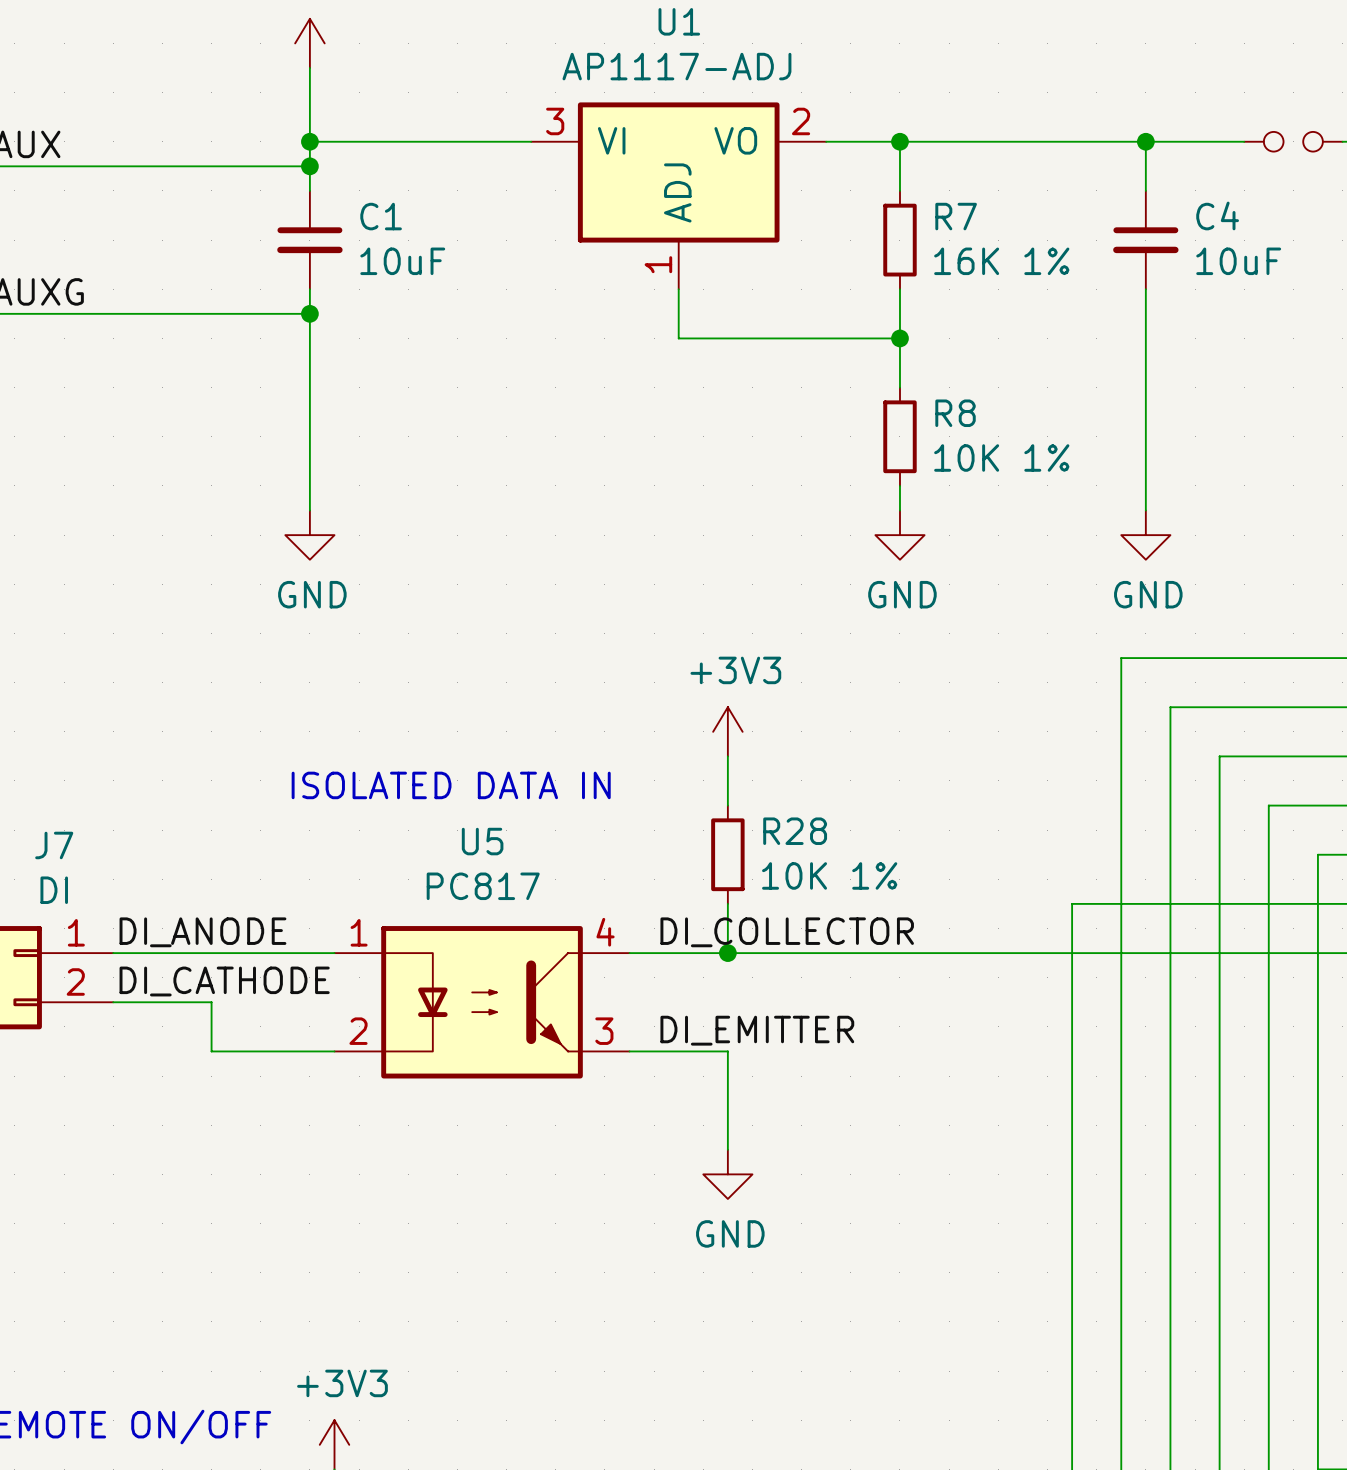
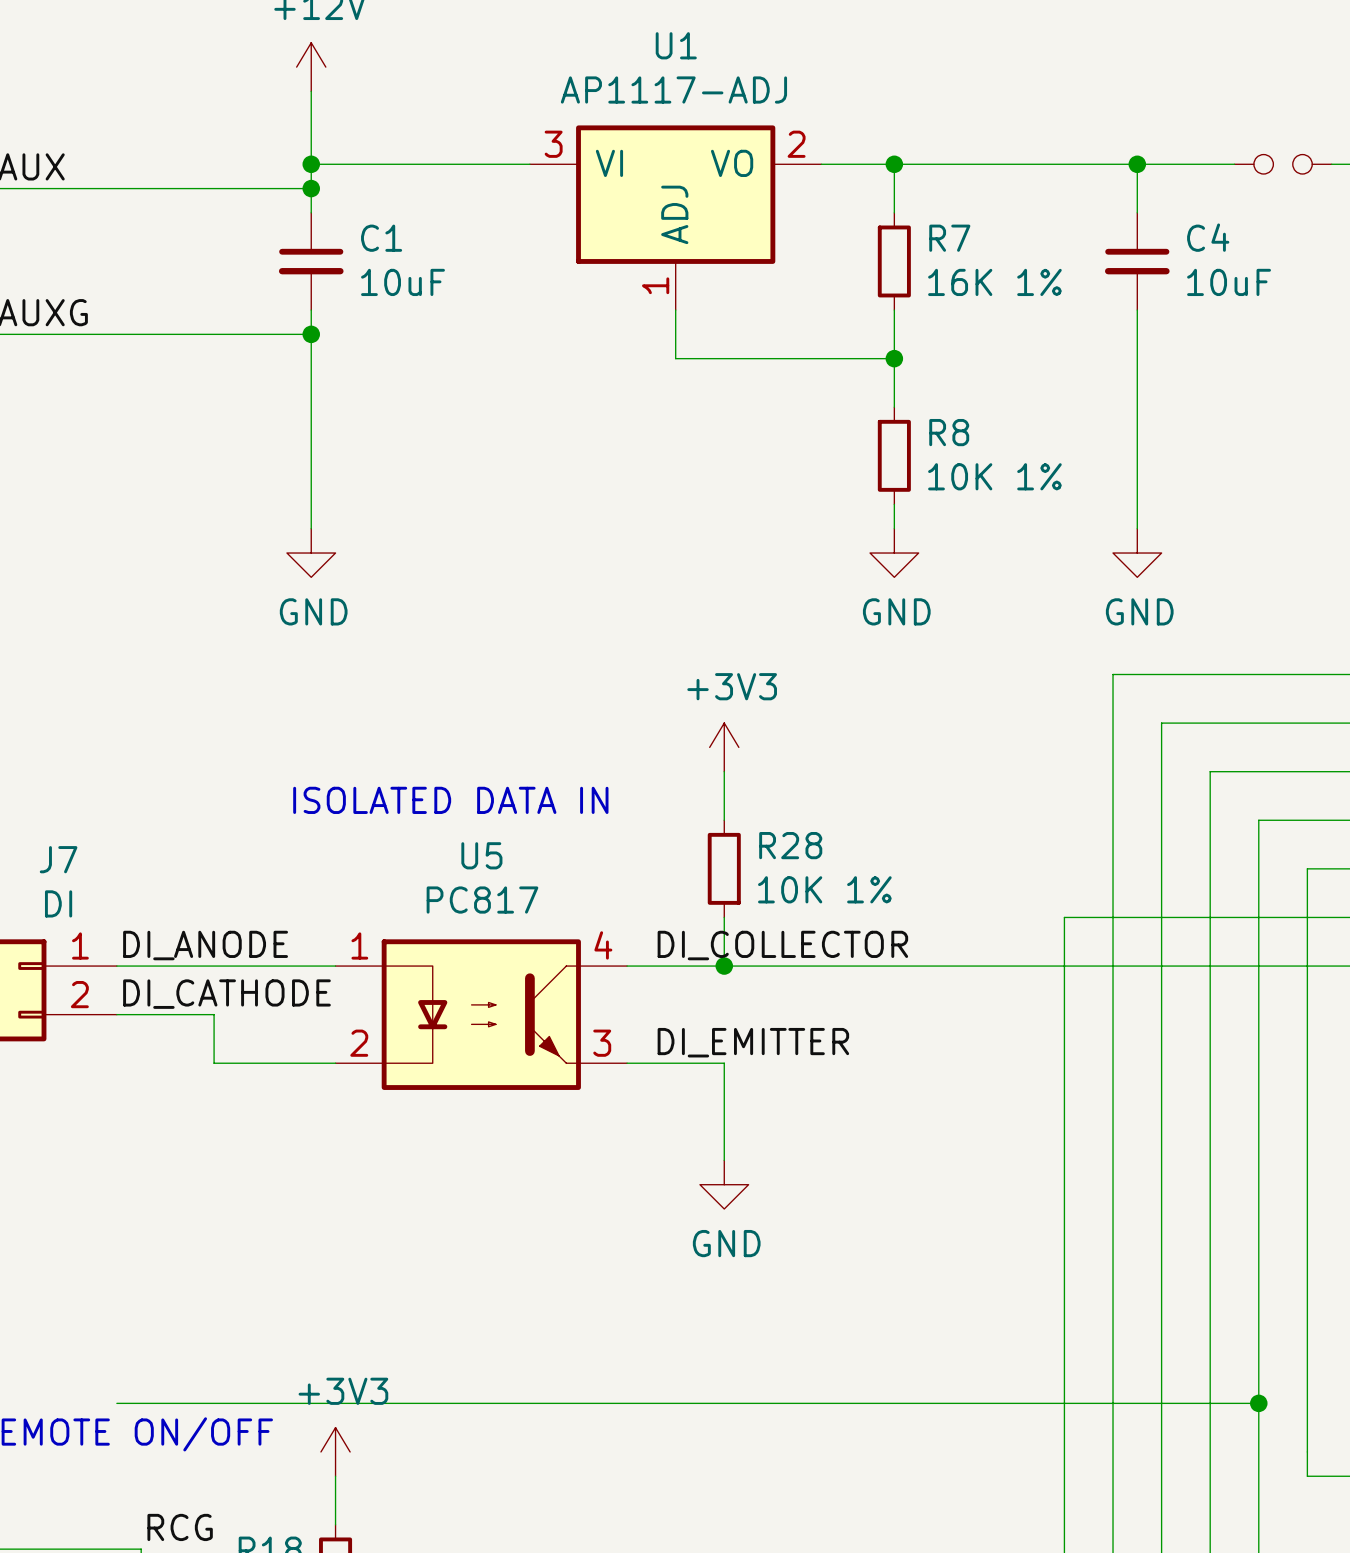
wire: none -> (116, 1403) (1258, 1403)
junction: none -> (1258, 1403)

